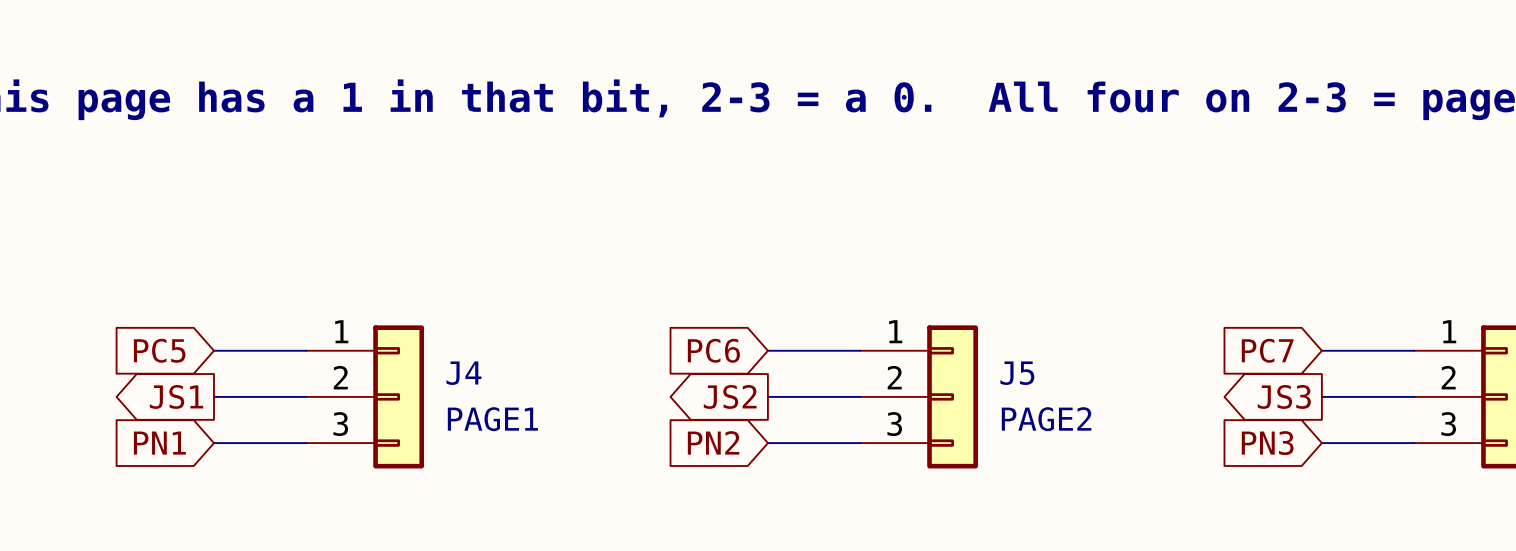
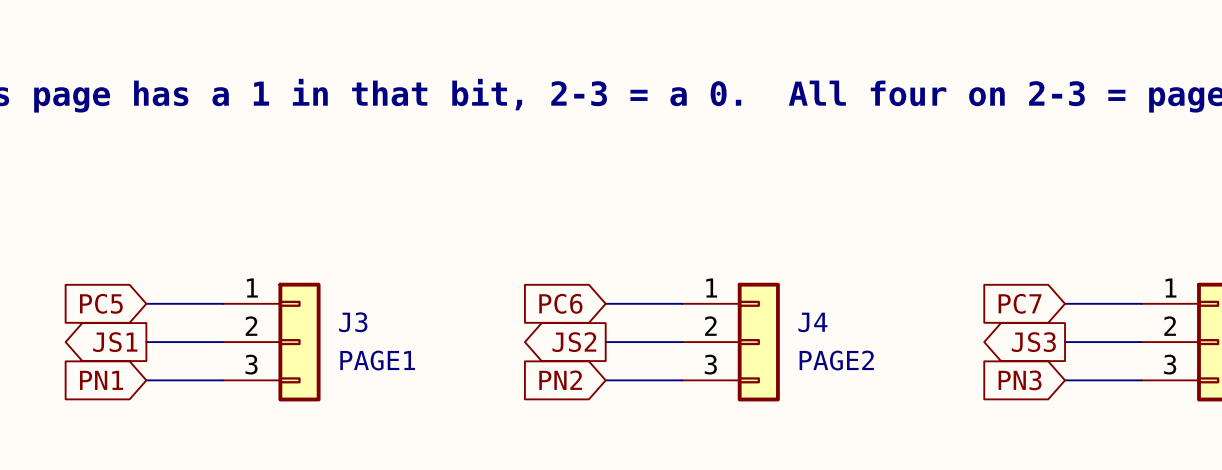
J4 name: J4 (463, 373) -> J3 (353, 322)
J5 name: J5 (1017, 373) -> J4 (812, 322)

